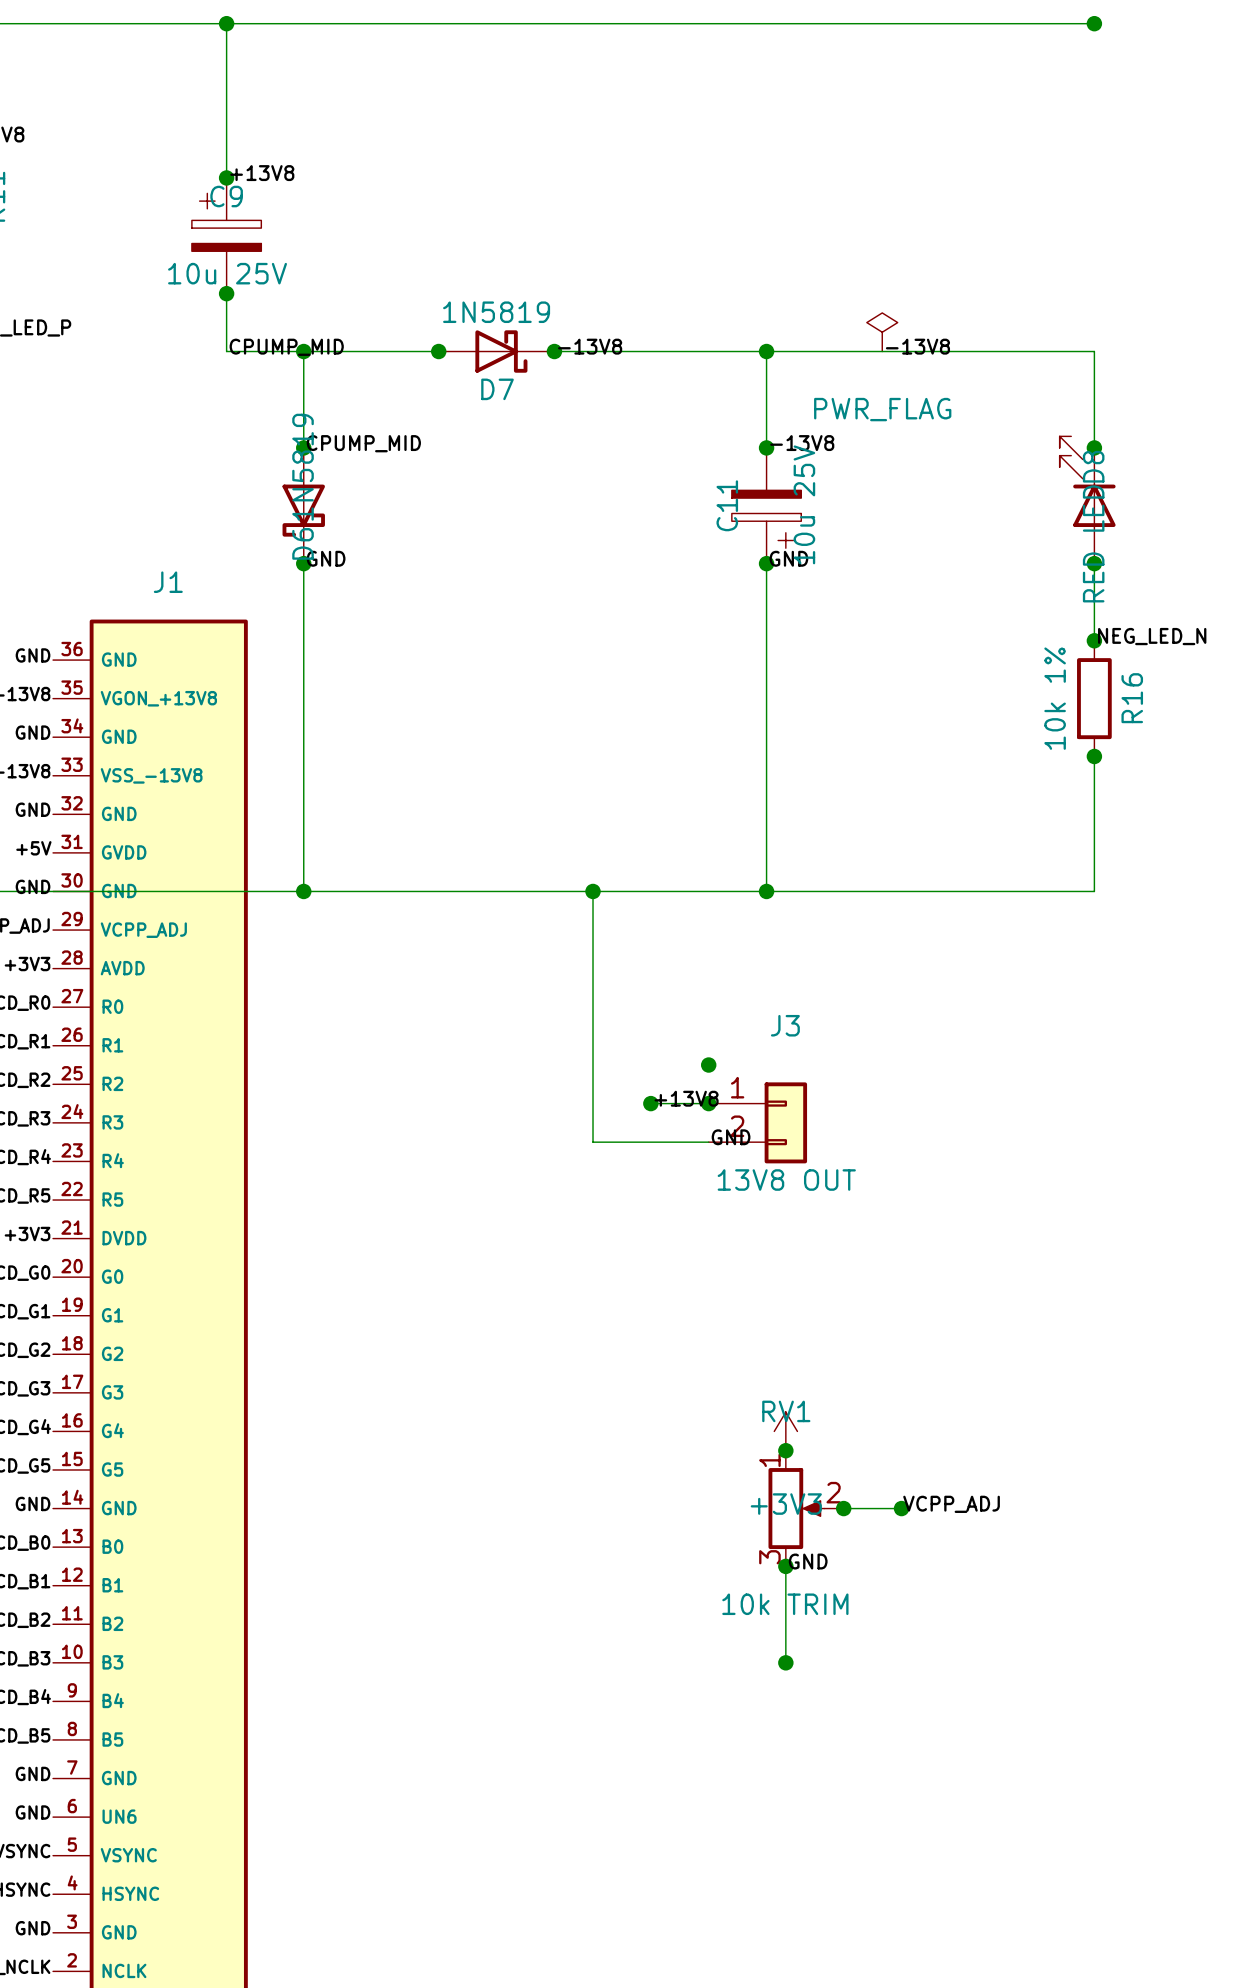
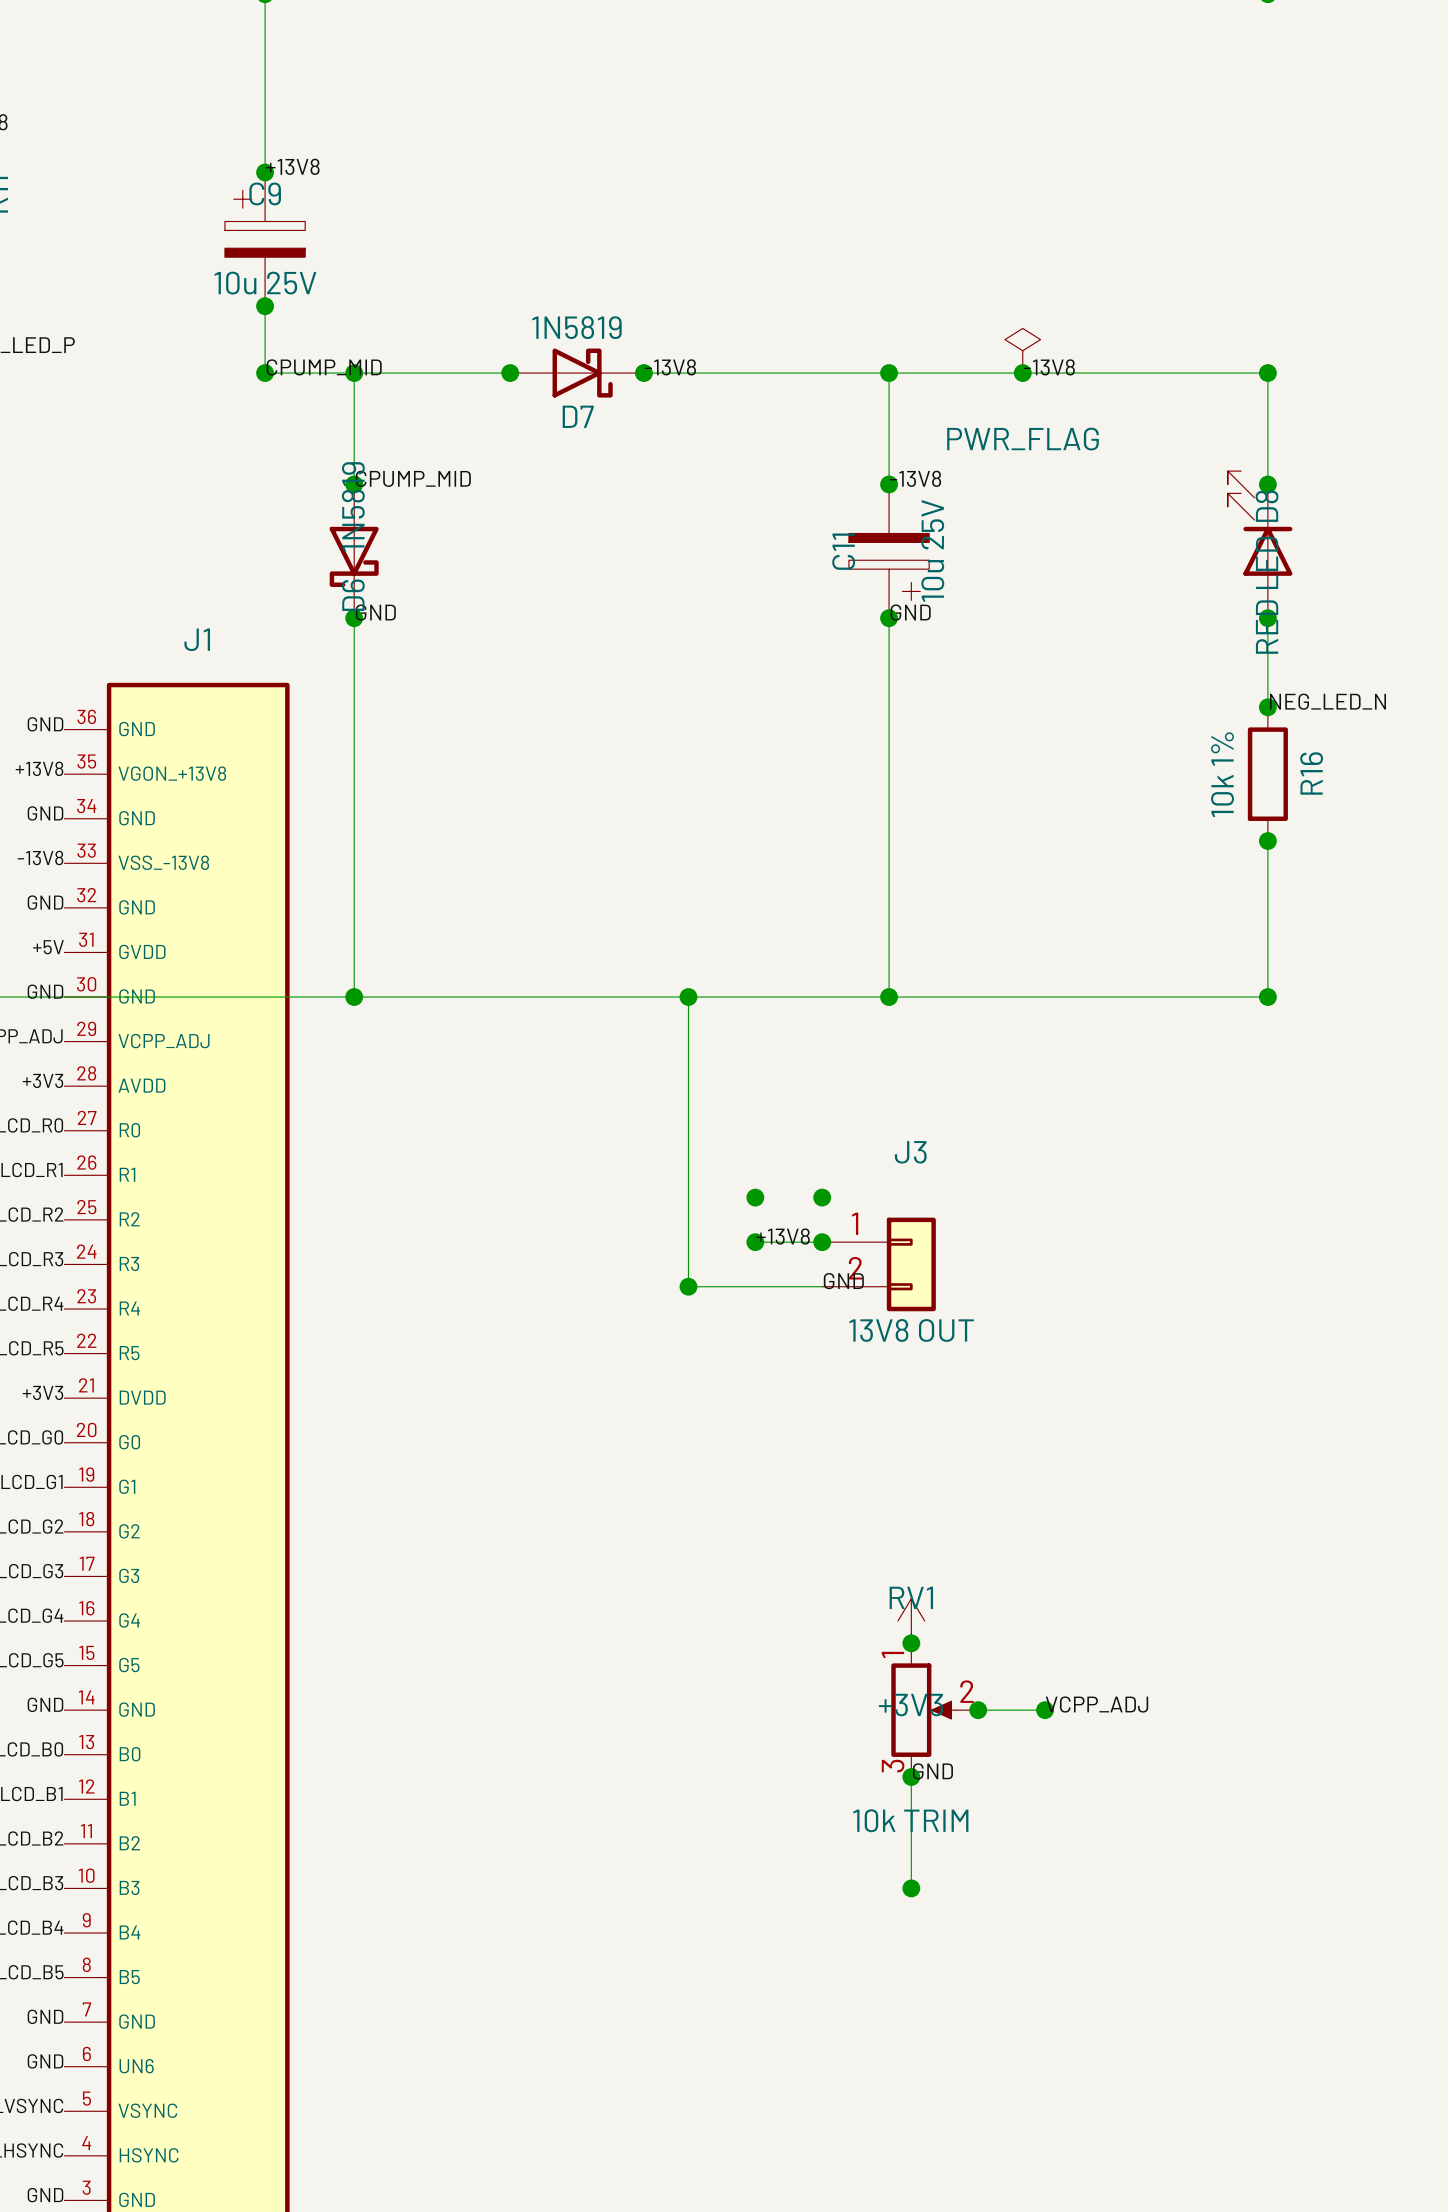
junction: none -> (265, 373)
junction: none -> (1022, 373)
junction: none -> (1267, 373)
junction: none -> (1267, 997)
junction: none -> (755, 1197)
junction: none -> (688, 1286)

